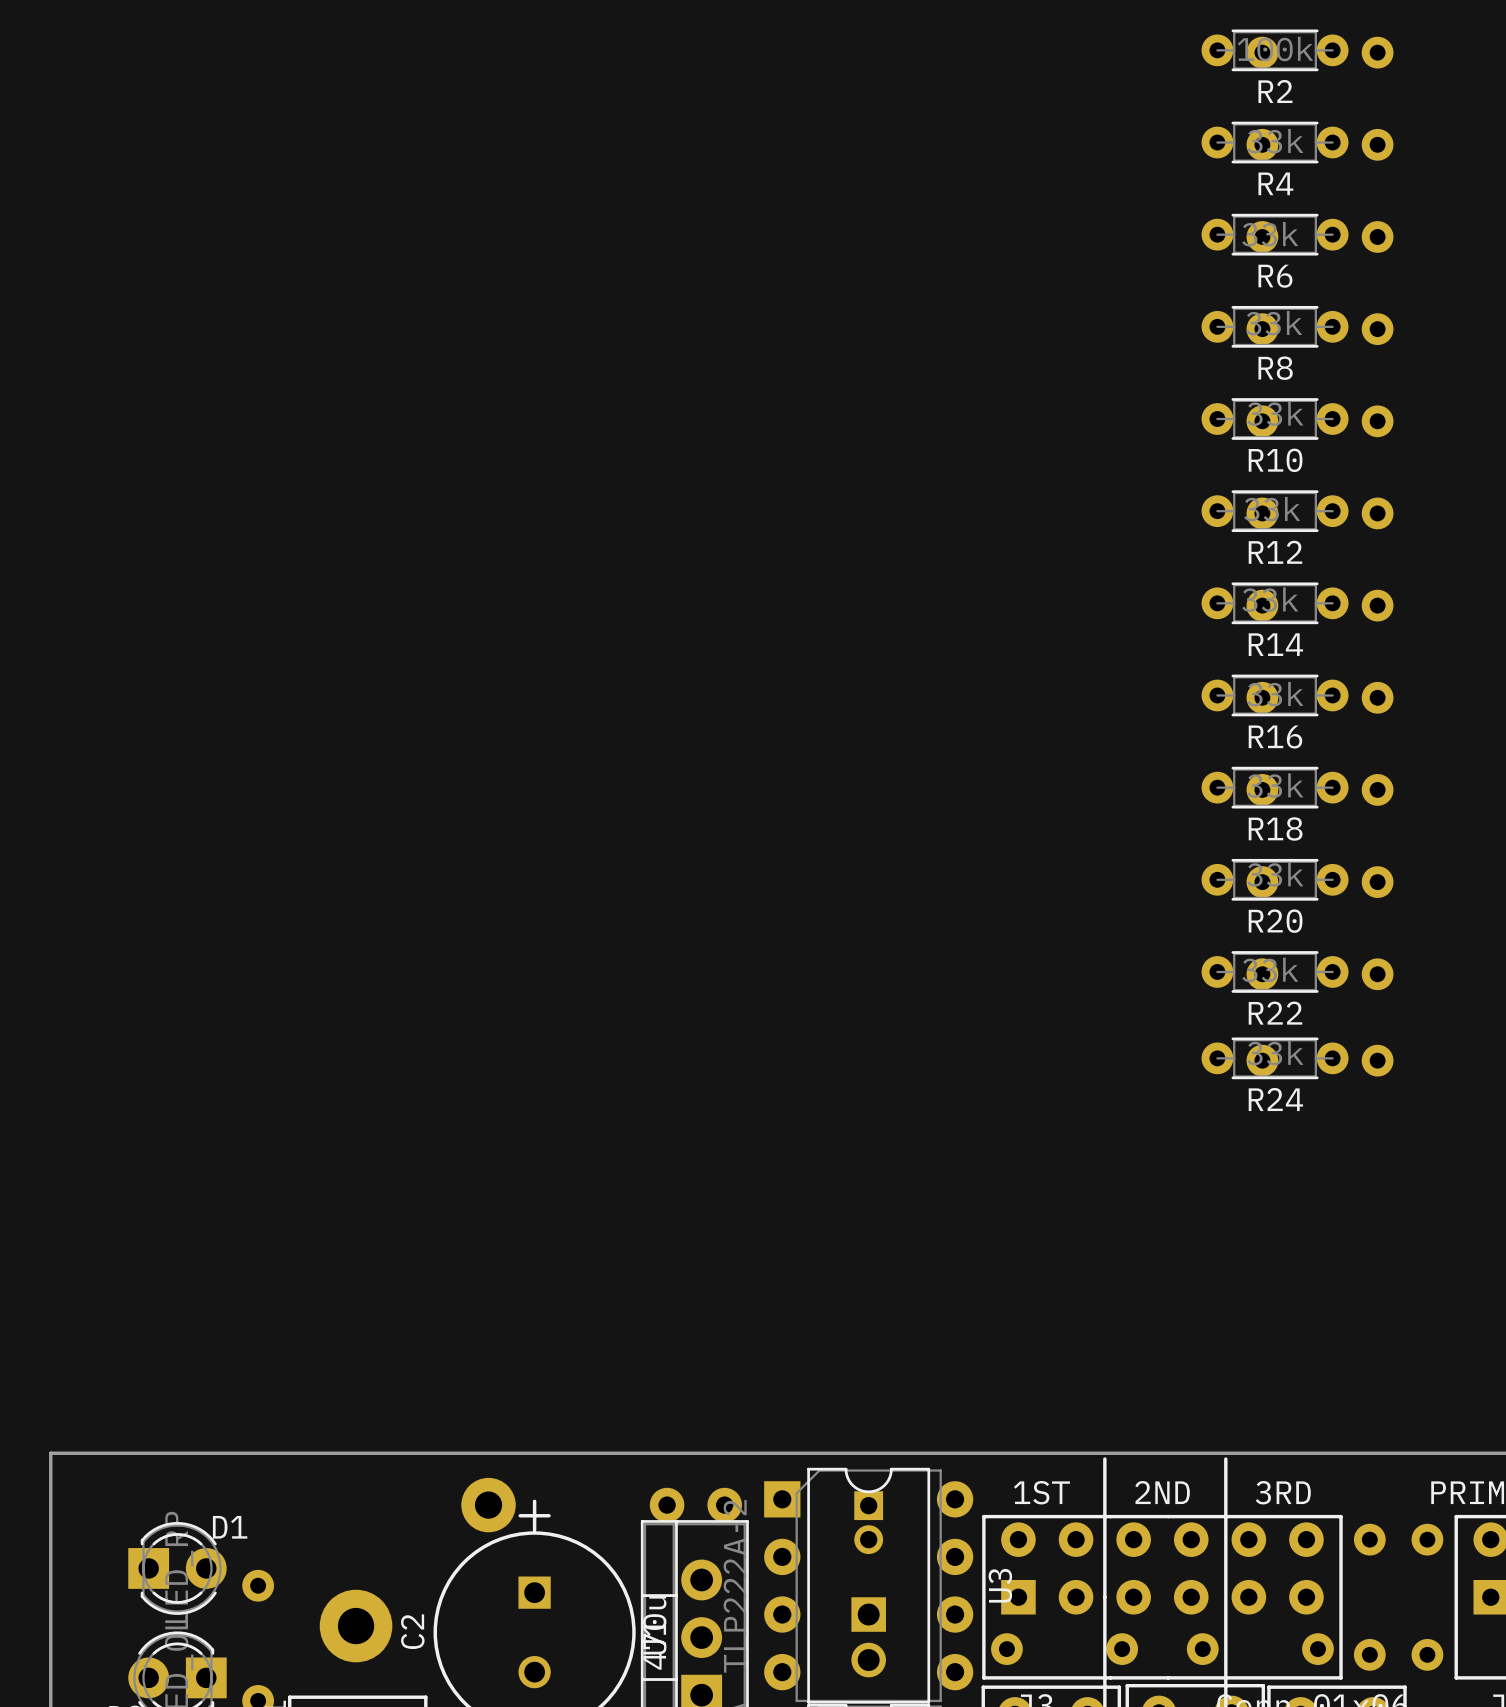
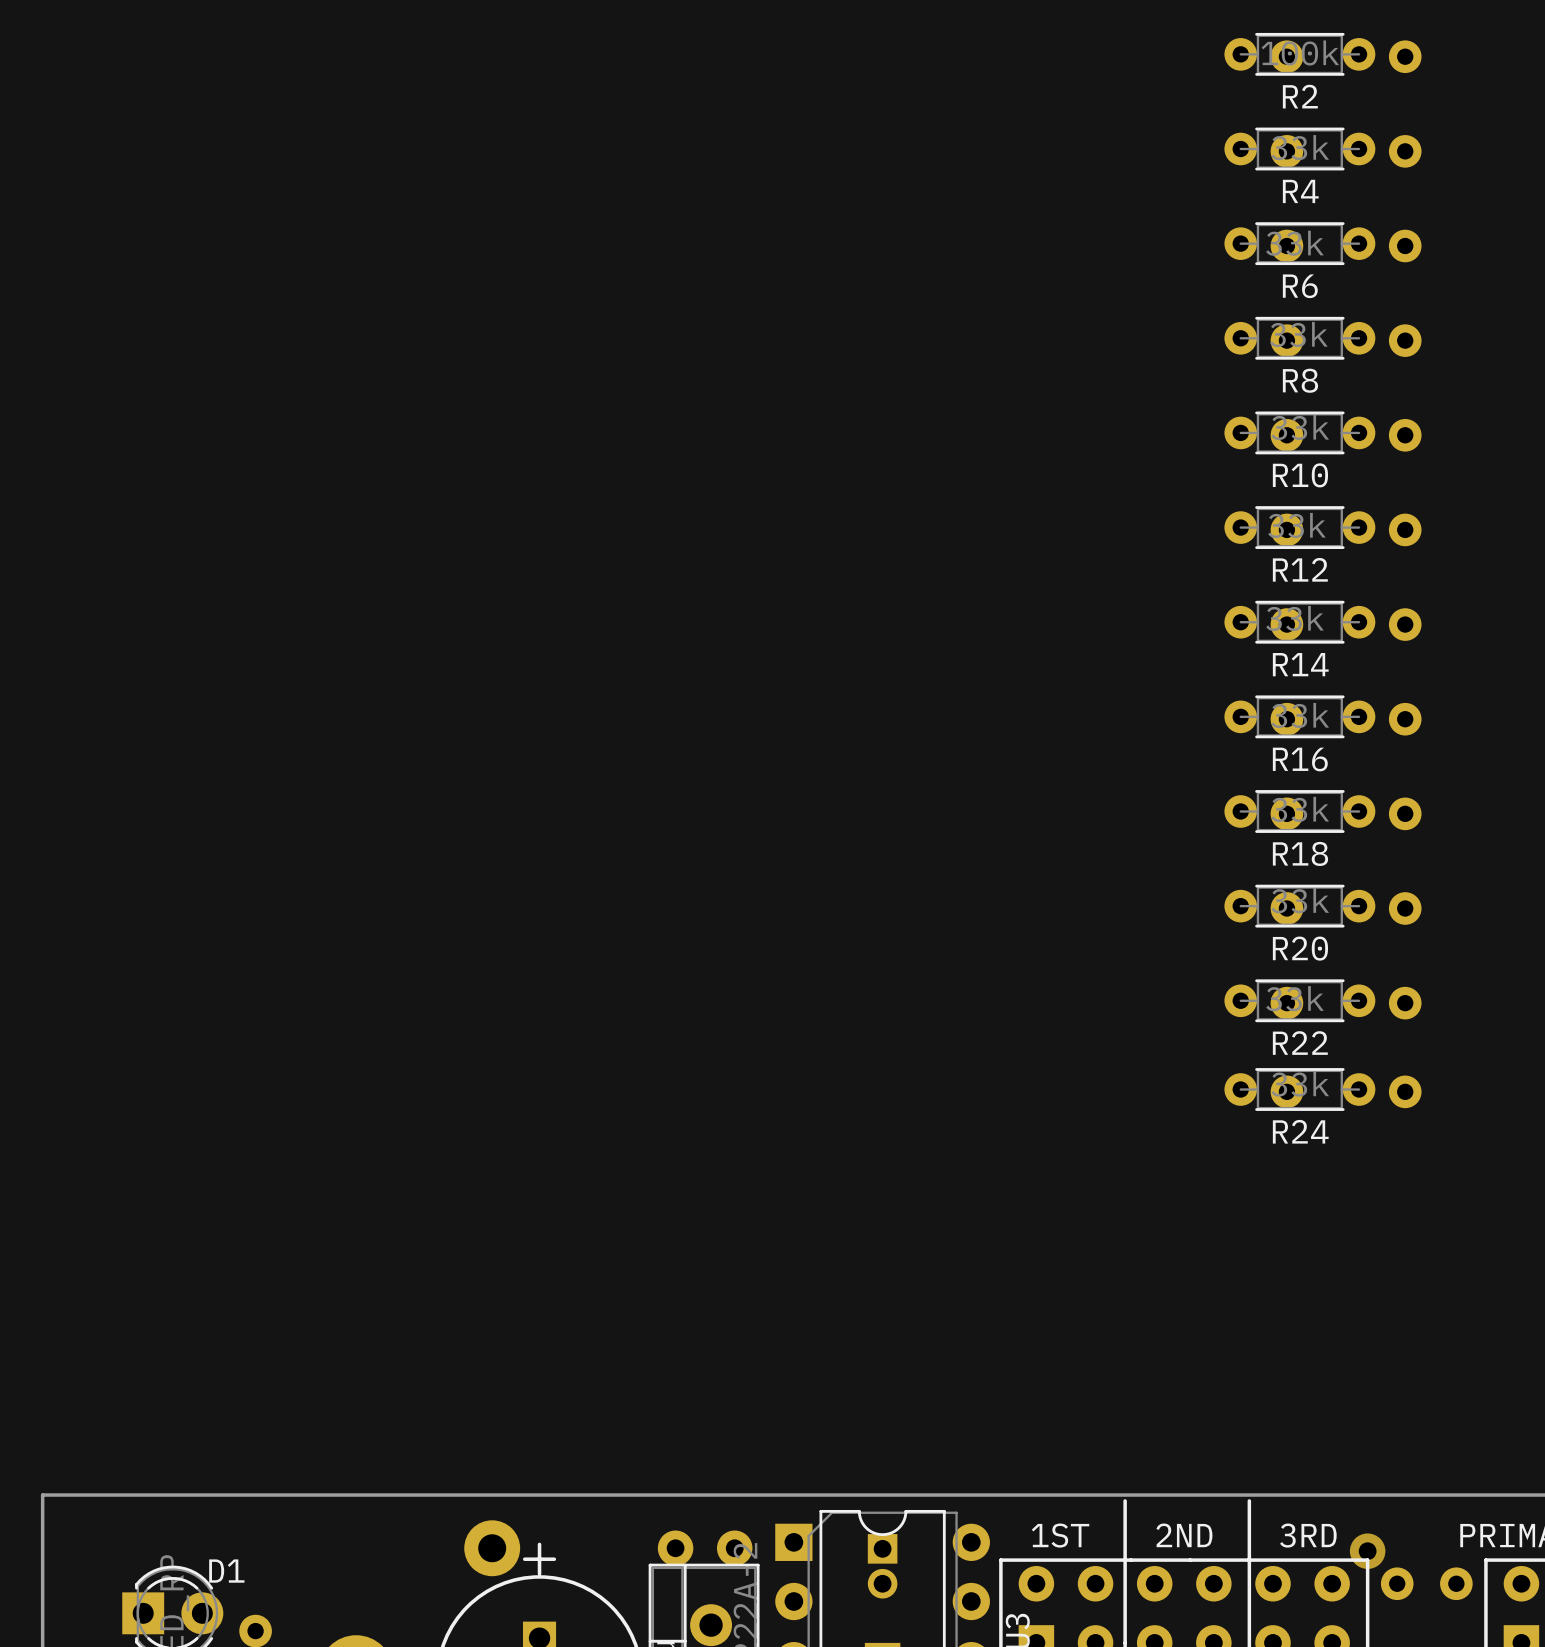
via: none -> (1367, 1551)

